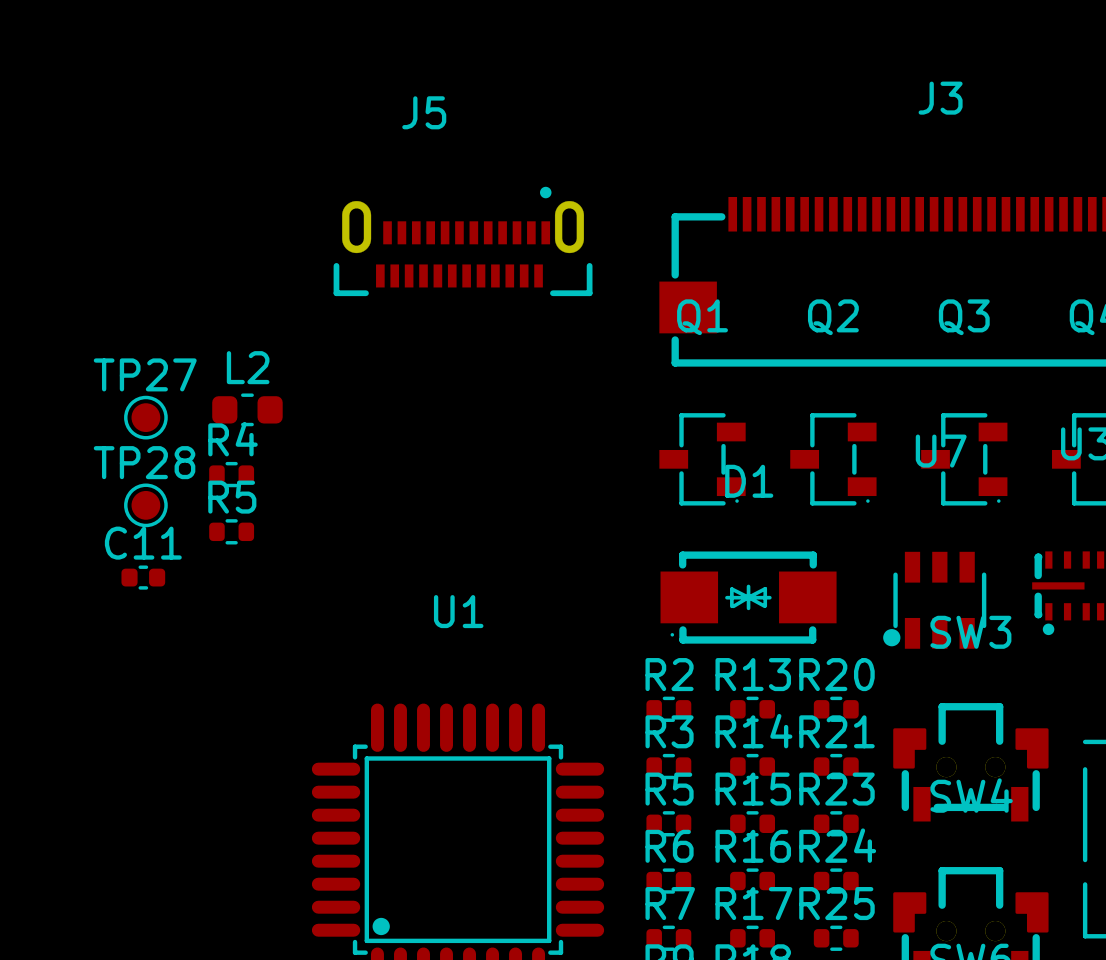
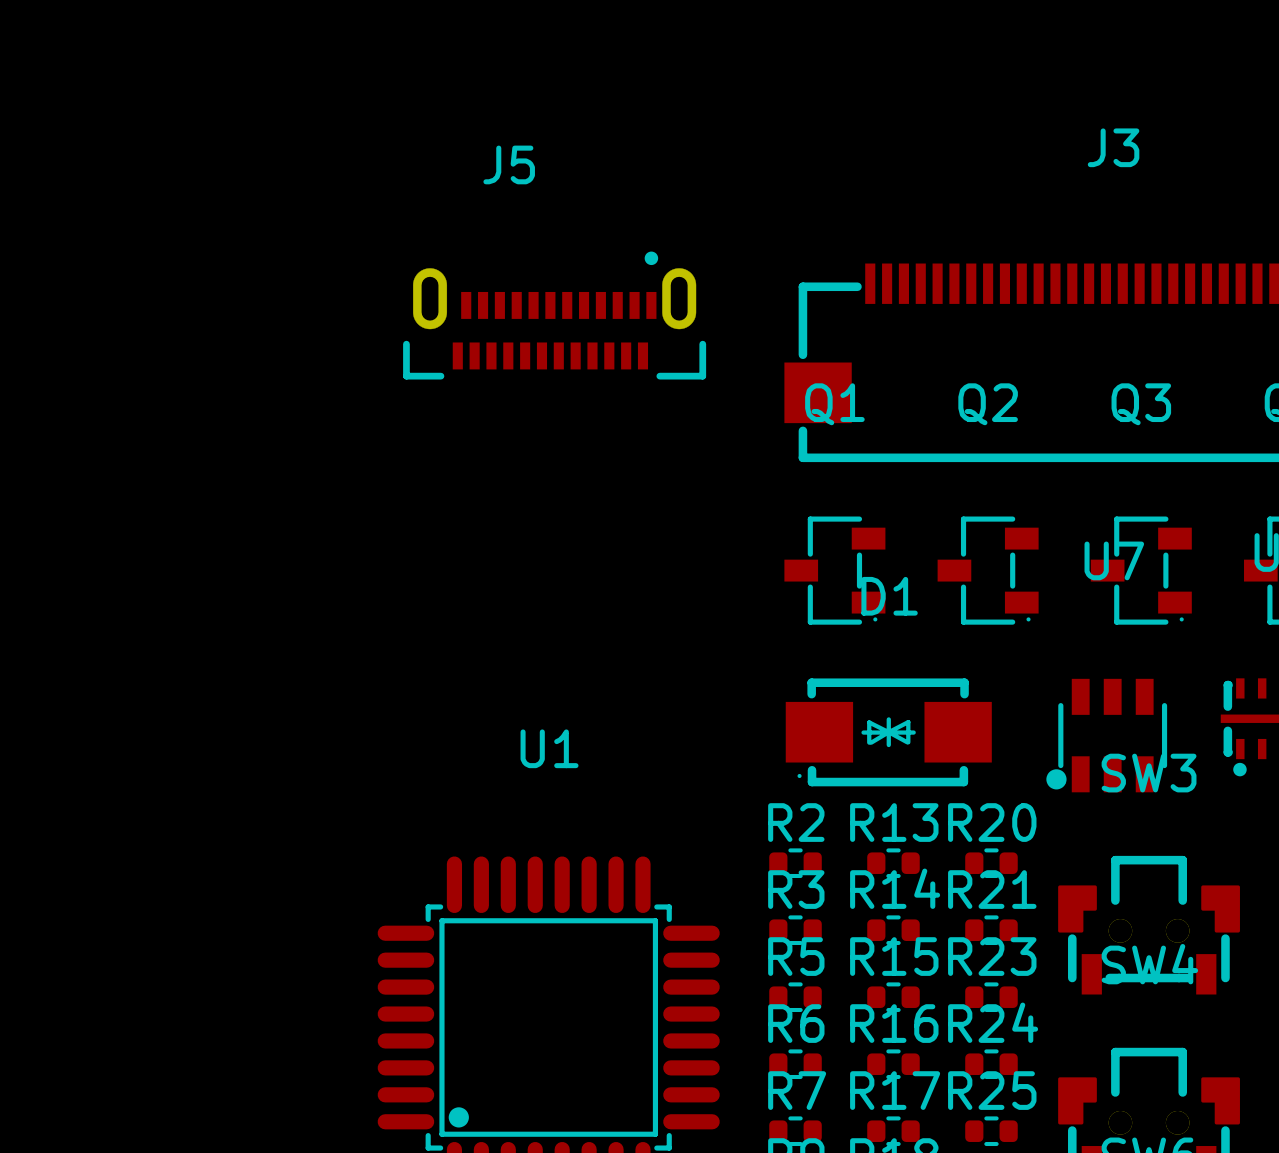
L2: (247, 409) -> none
TP27: (145, 417) -> none
R4: (231, 474) -> none
TP28: (145, 505) -> none
R5: (231, 531) -> none
C11: (143, 577) -> none

